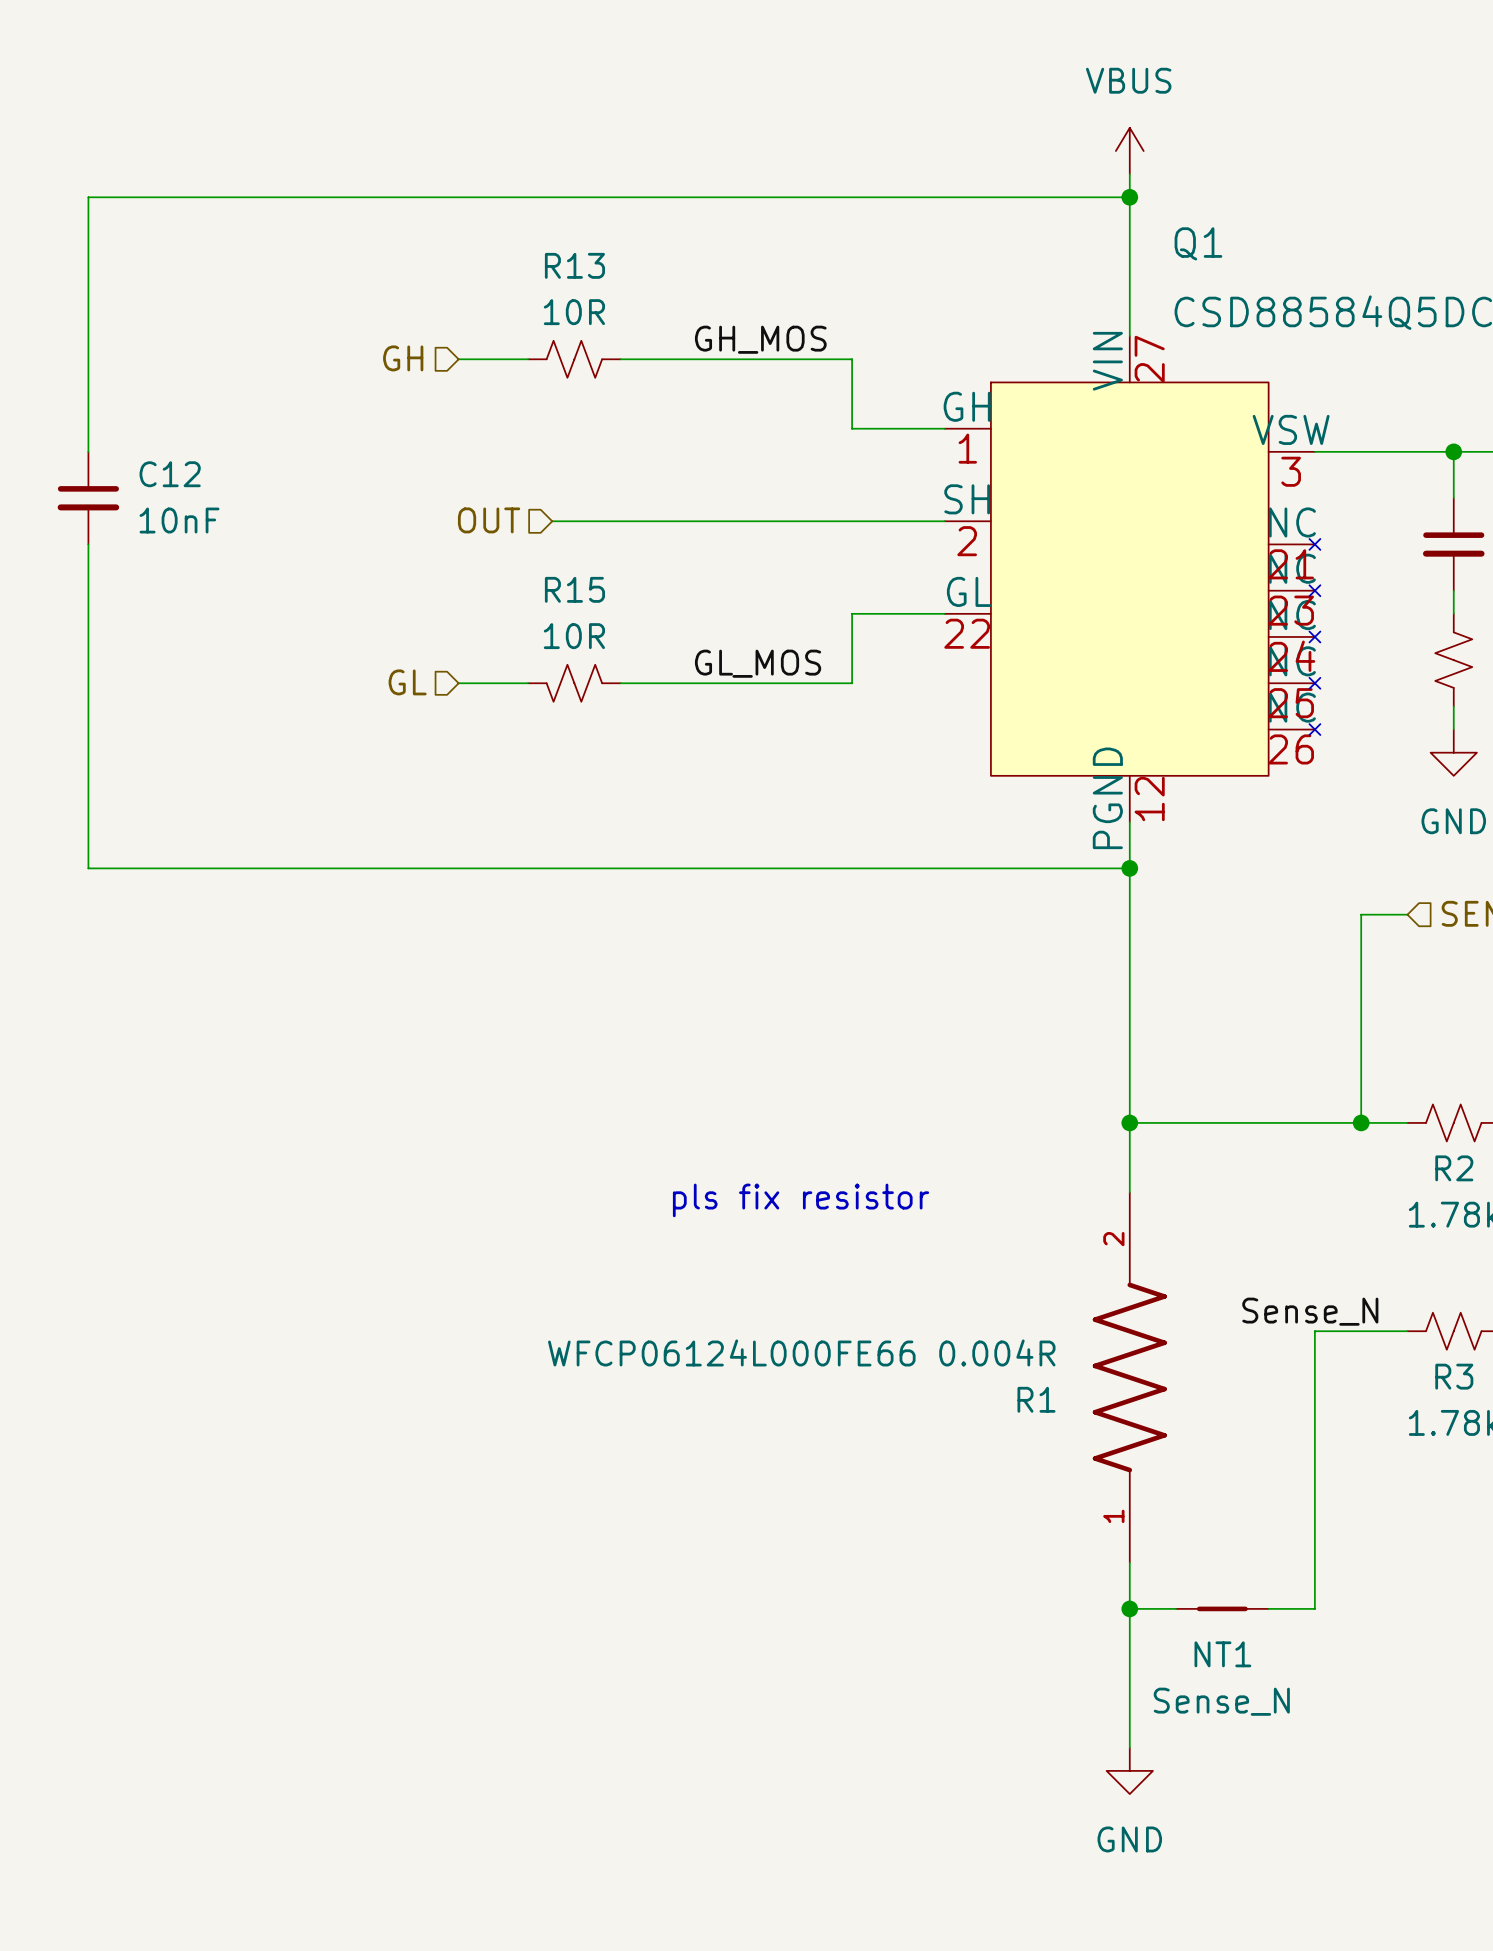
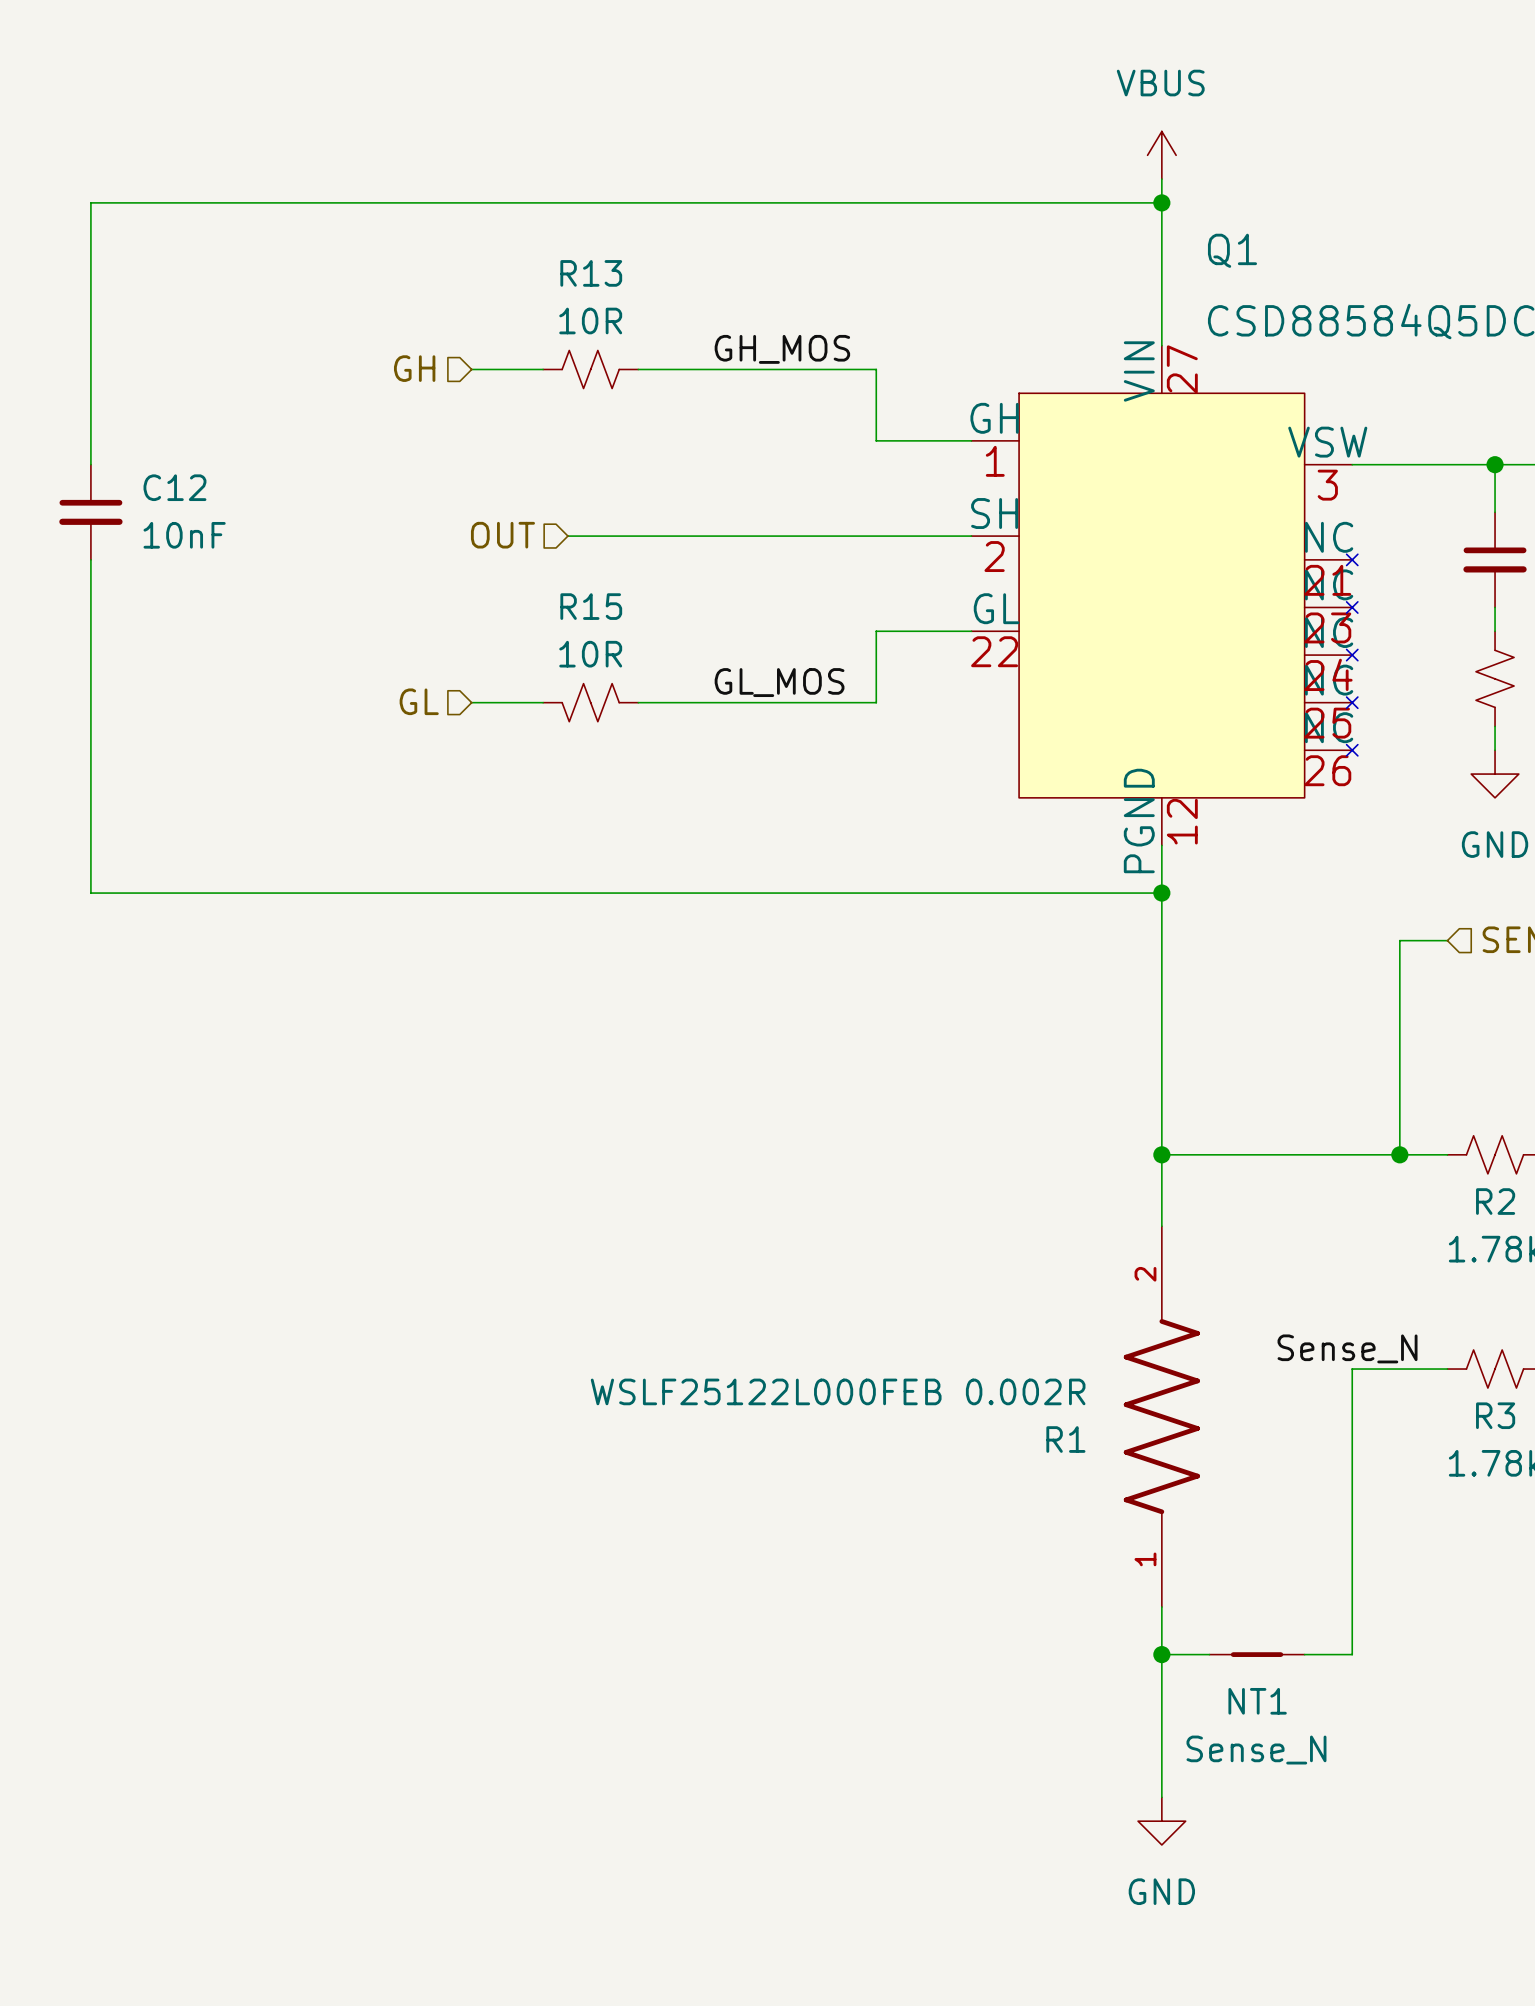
text: pls fix resistor (801, 1200) -> none
R1 value: WFCP06124L000FE66 0.004R (801, 1352) -> WSLF25122L000FEB 0.002R (838, 1391)

